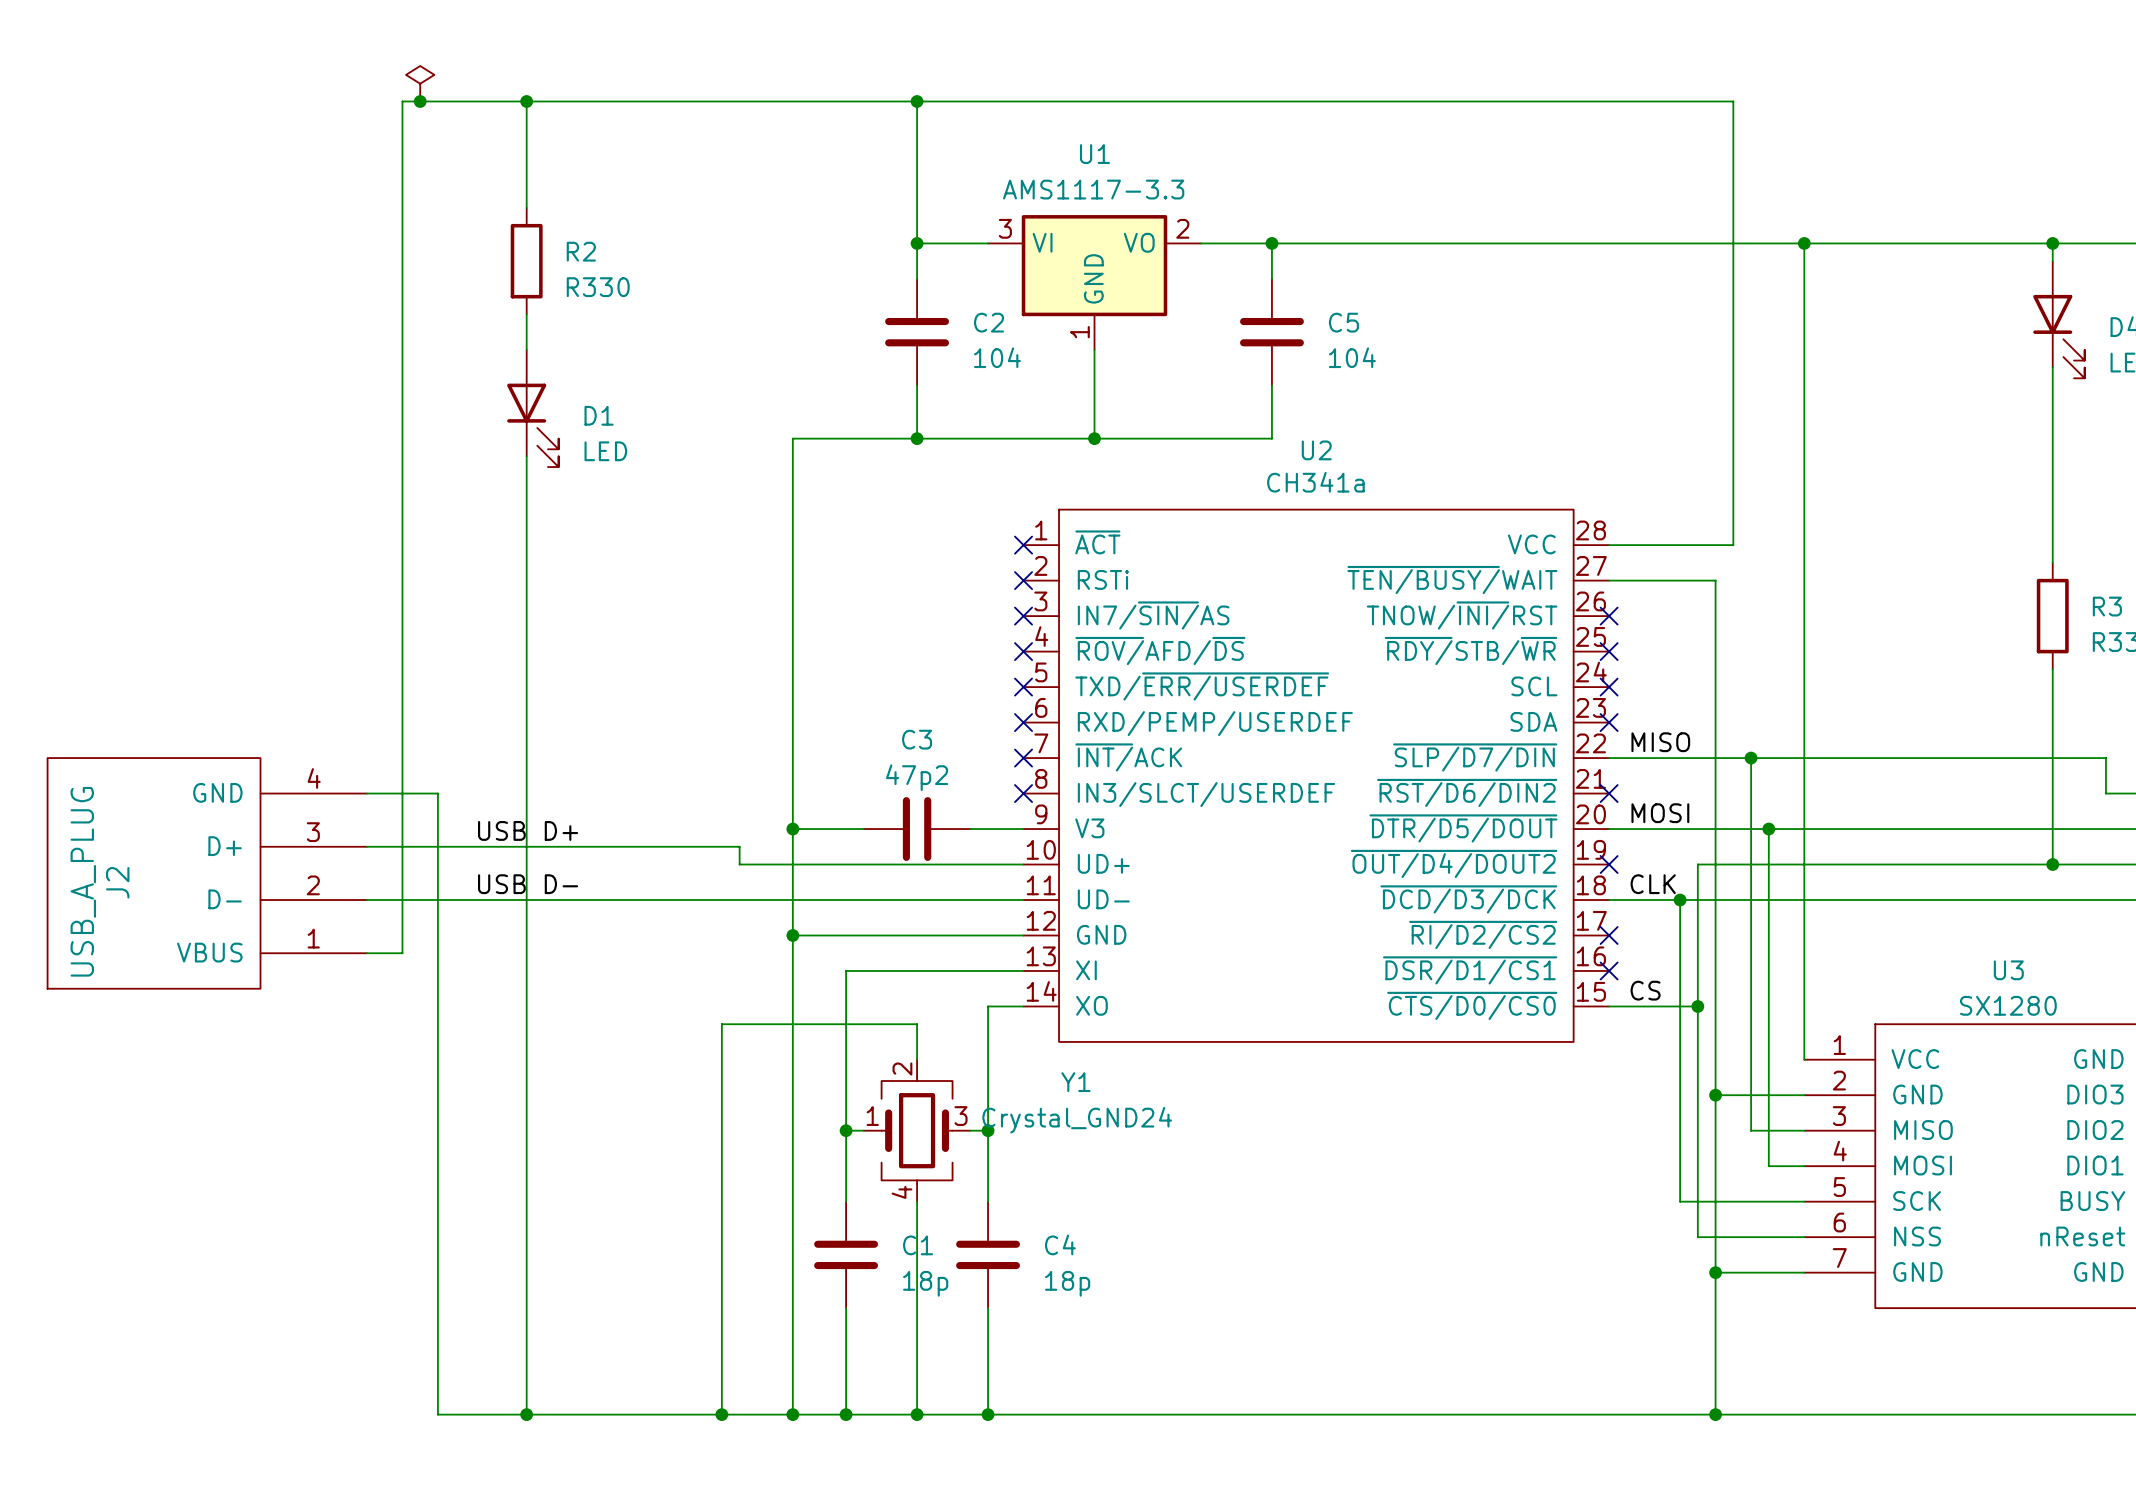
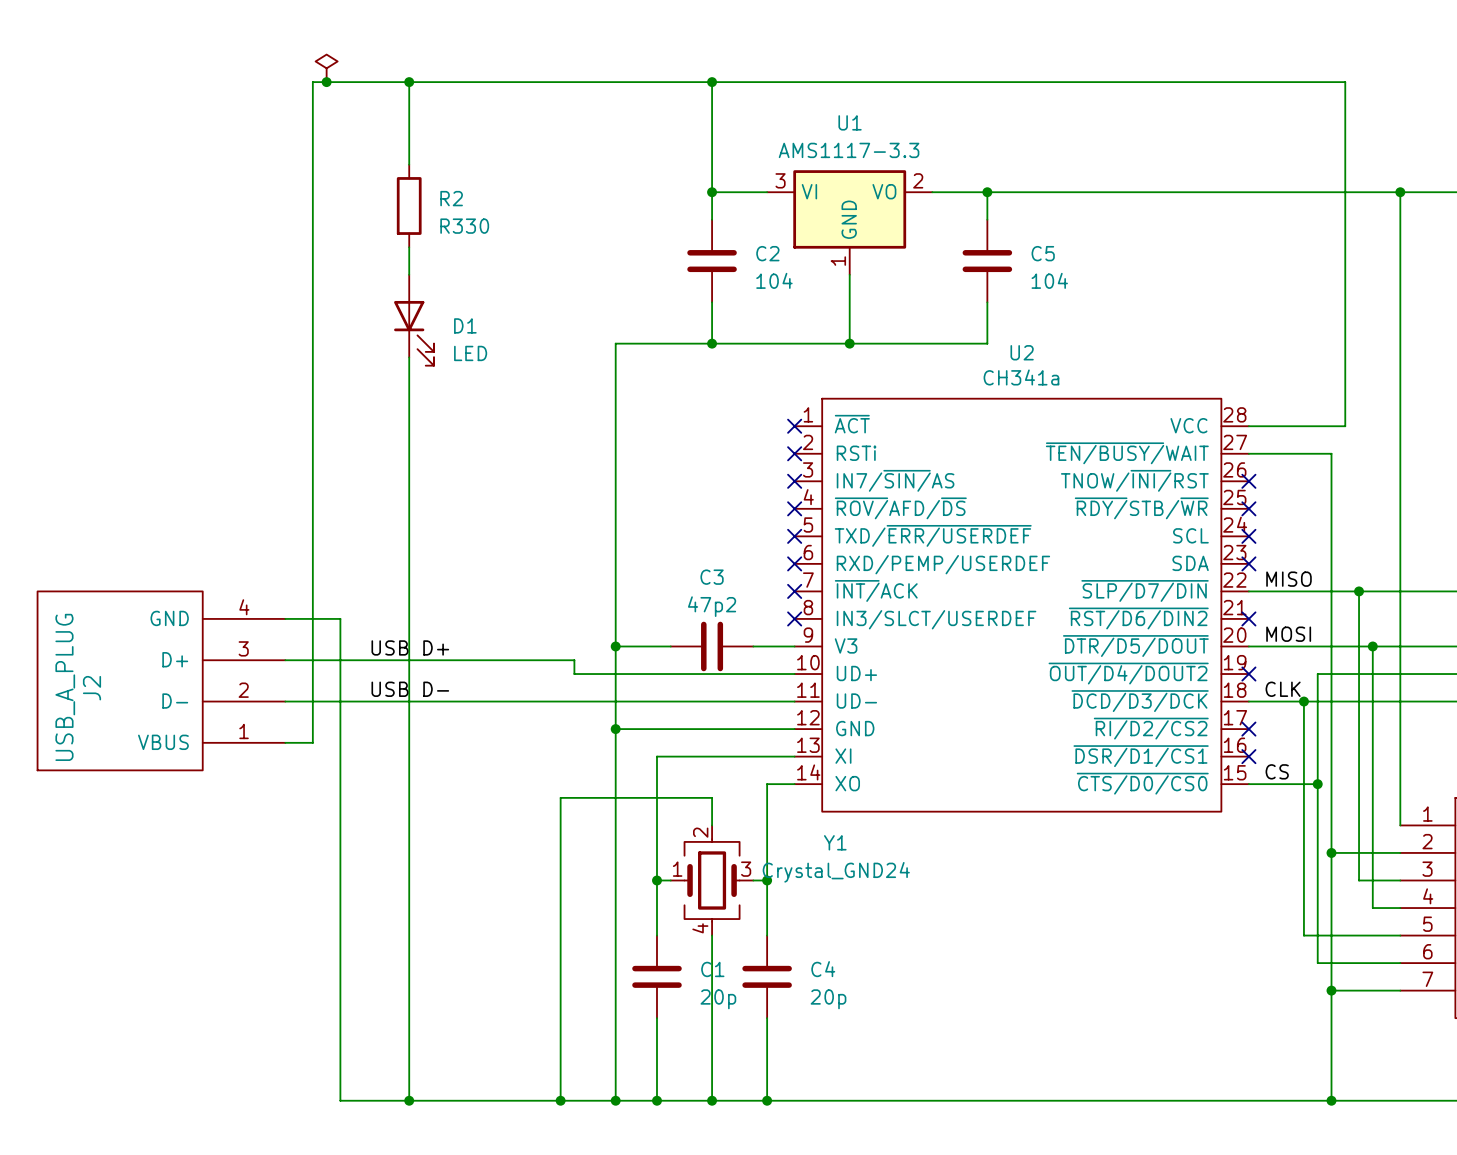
C1 value: 18p (925, 1283) -> 20p (718, 999)
C4 value: 18p (1067, 1283) -> 20p (828, 999)

